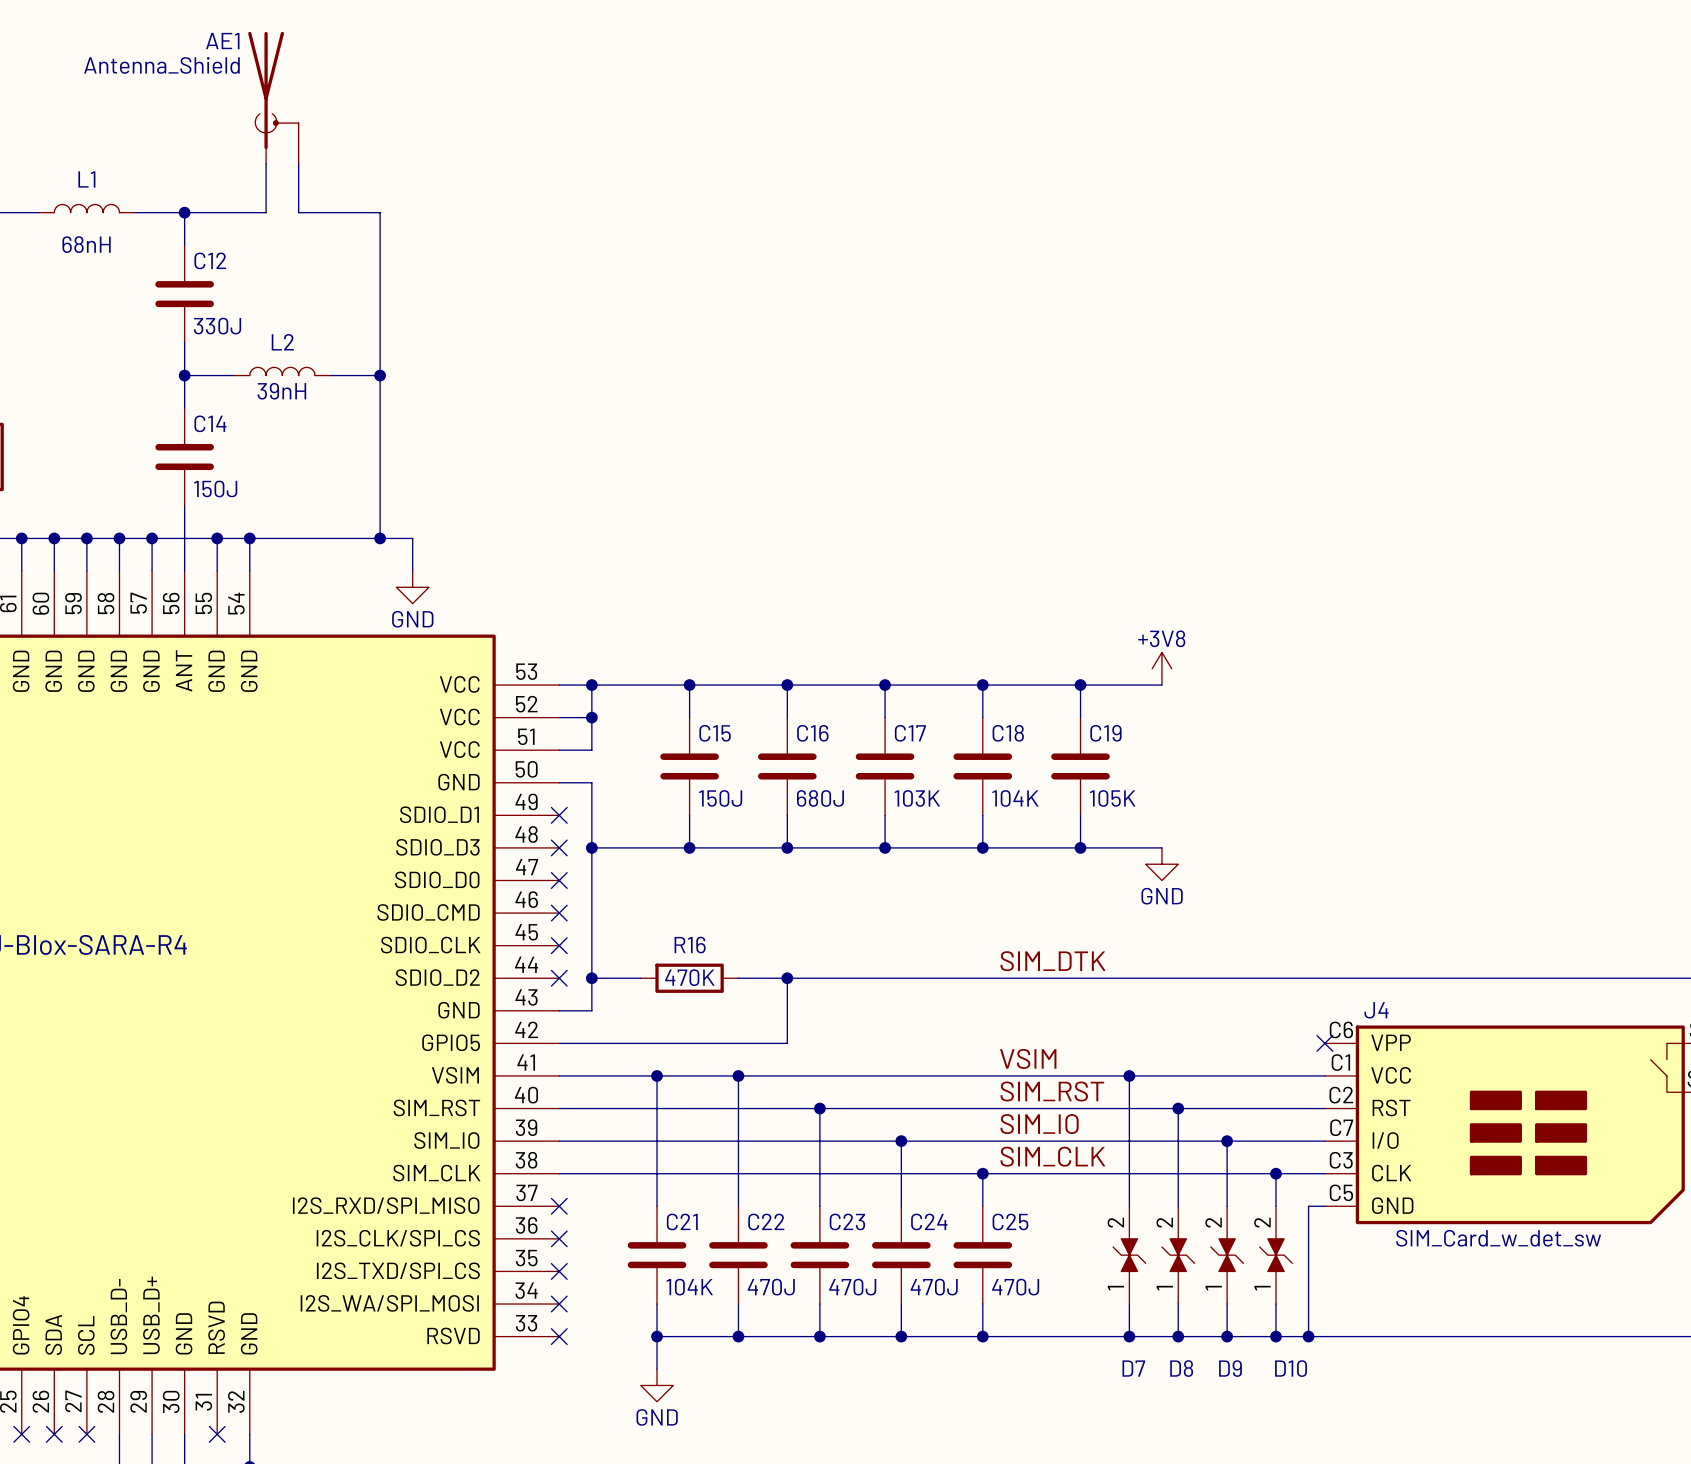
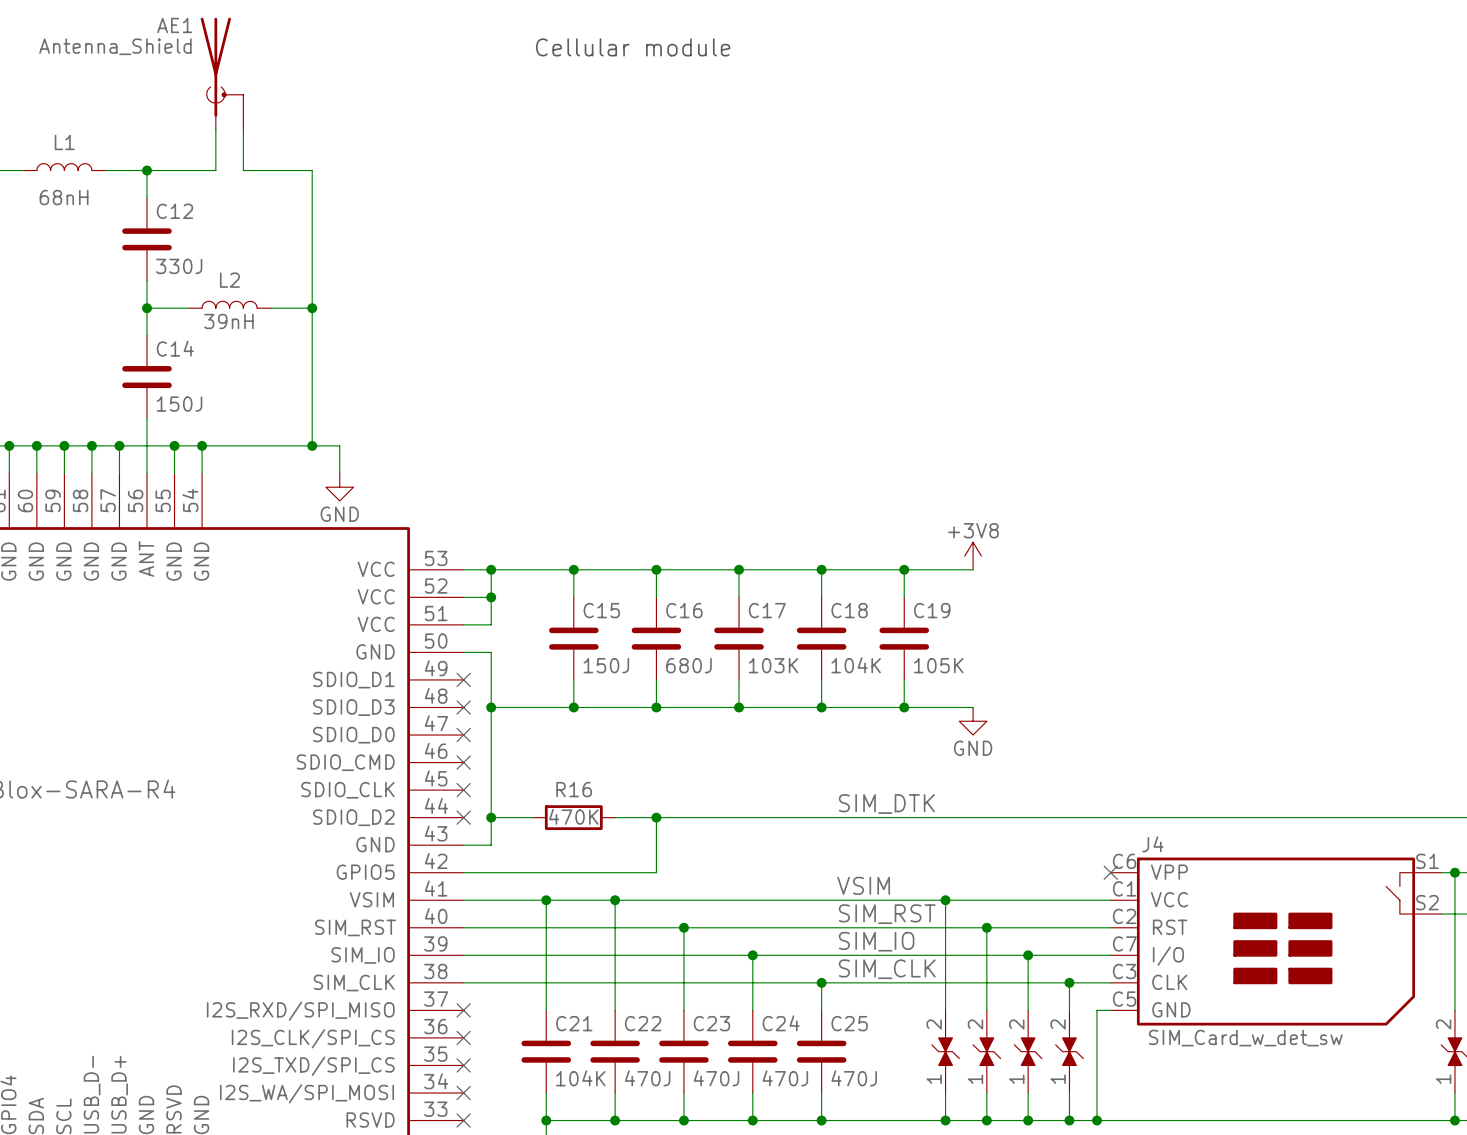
text: none -> Cellular module (633, 47)

